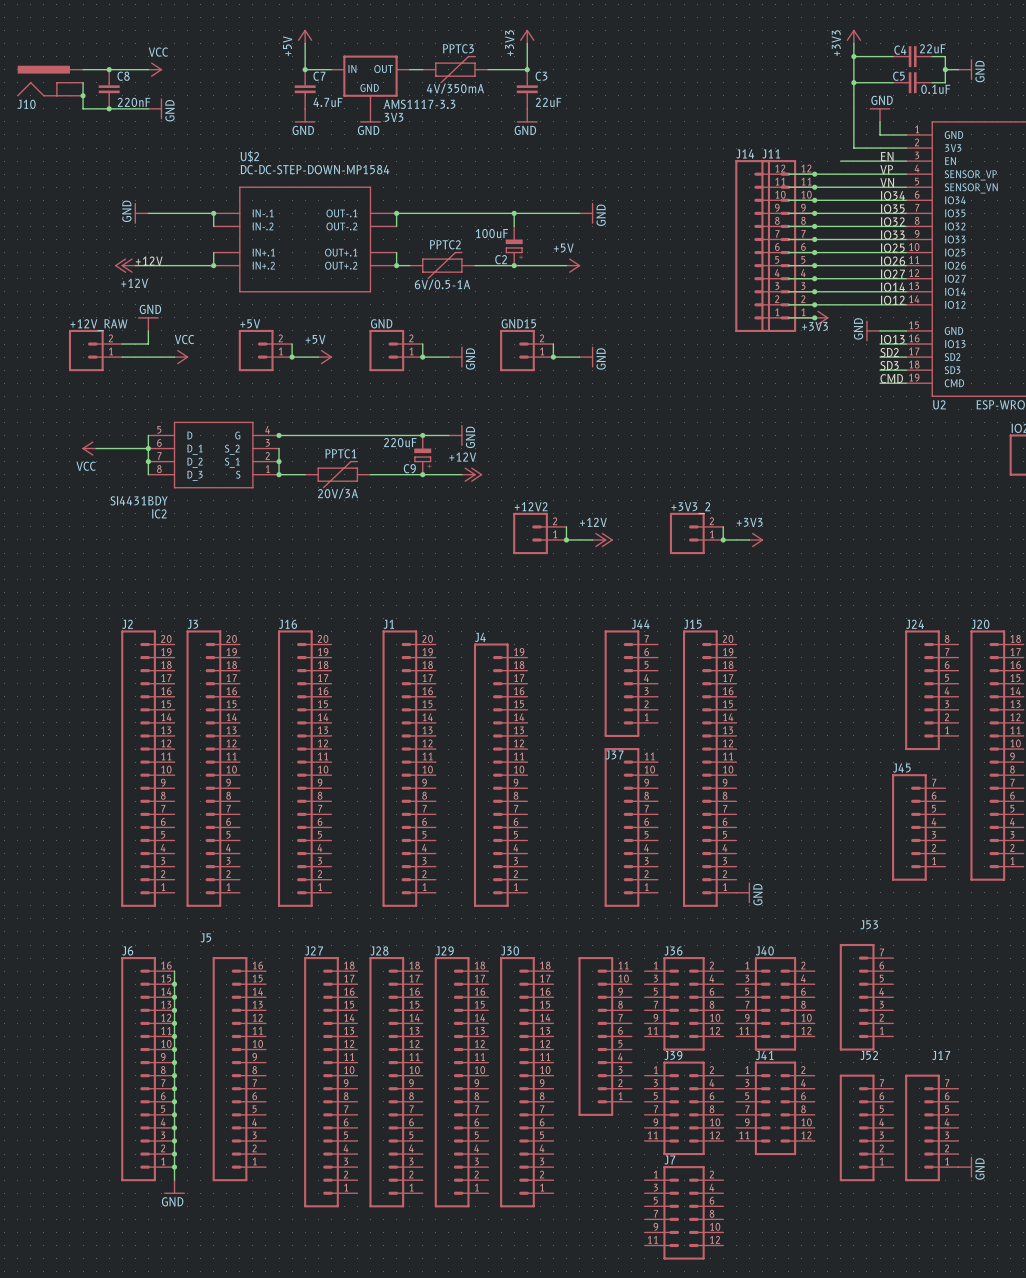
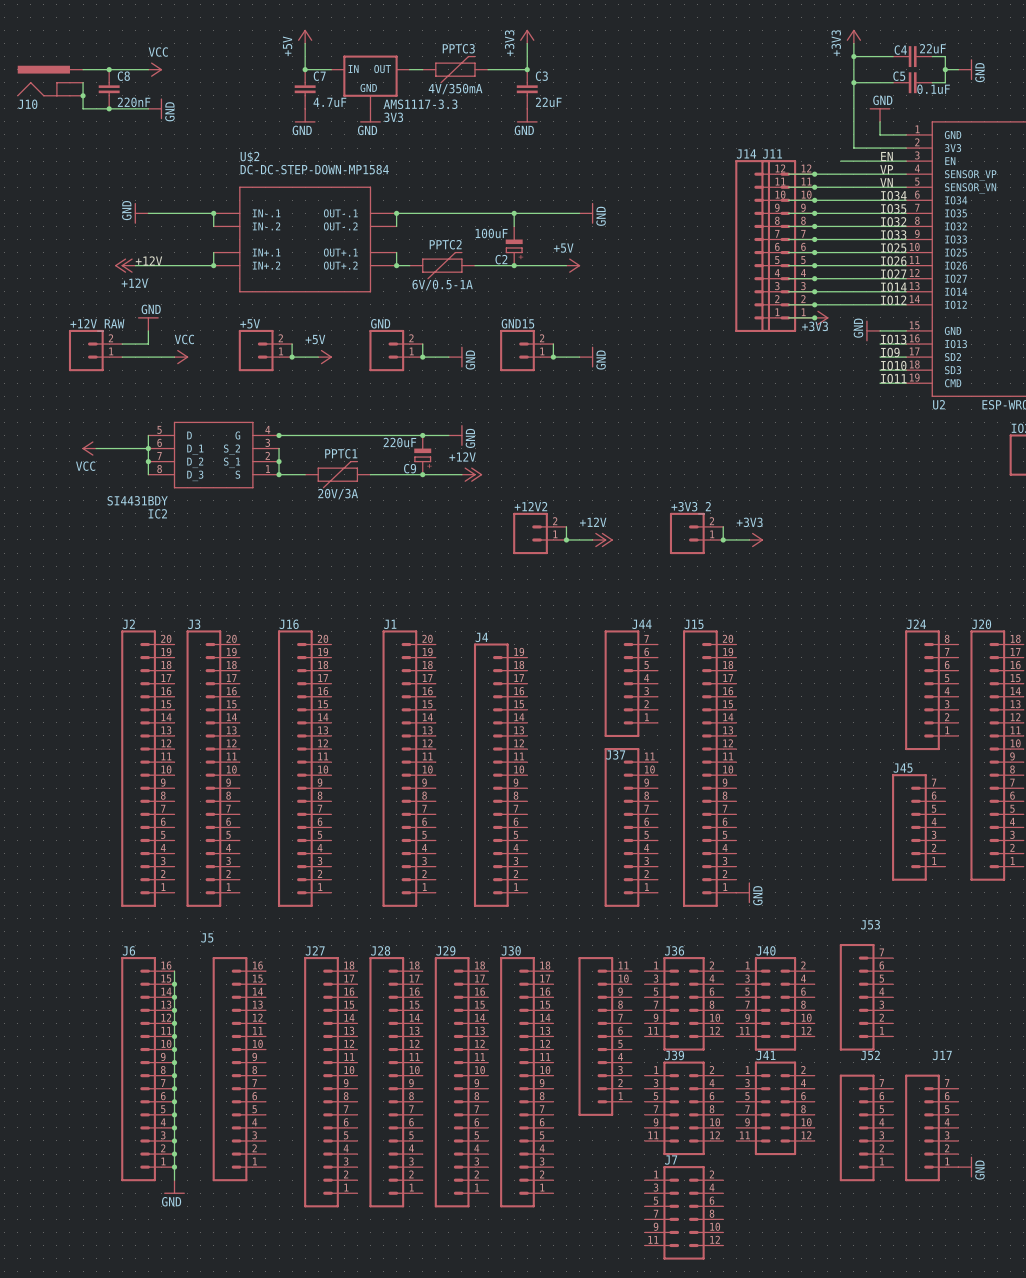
label: SD2 (889, 352) -> IO9 (890, 352)
label: SD3 (889, 365) -> IO10 (893, 365)
label: CMD (891, 378) -> IO11 (893, 378)

